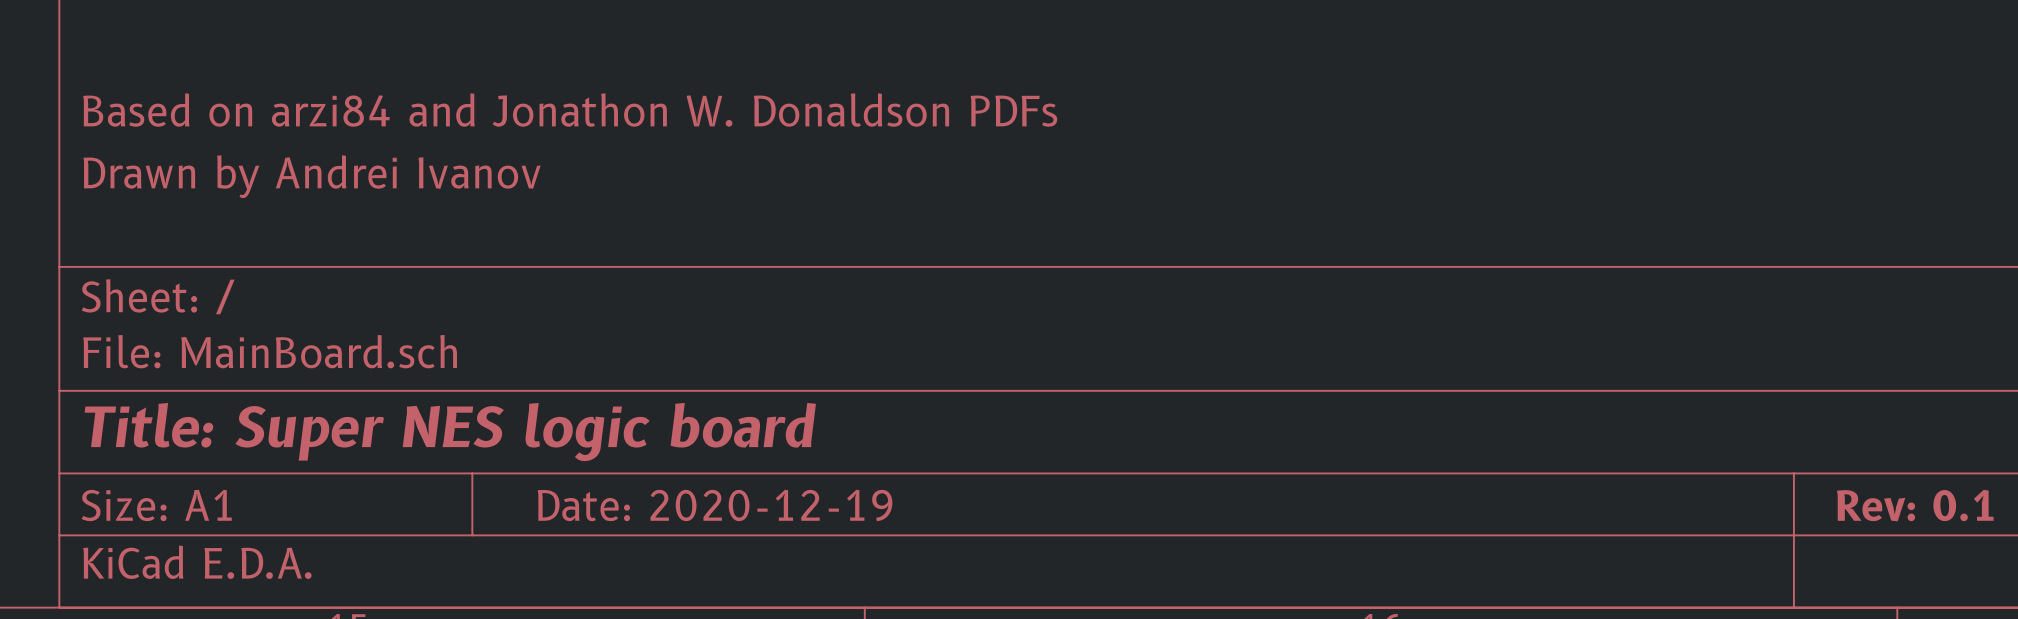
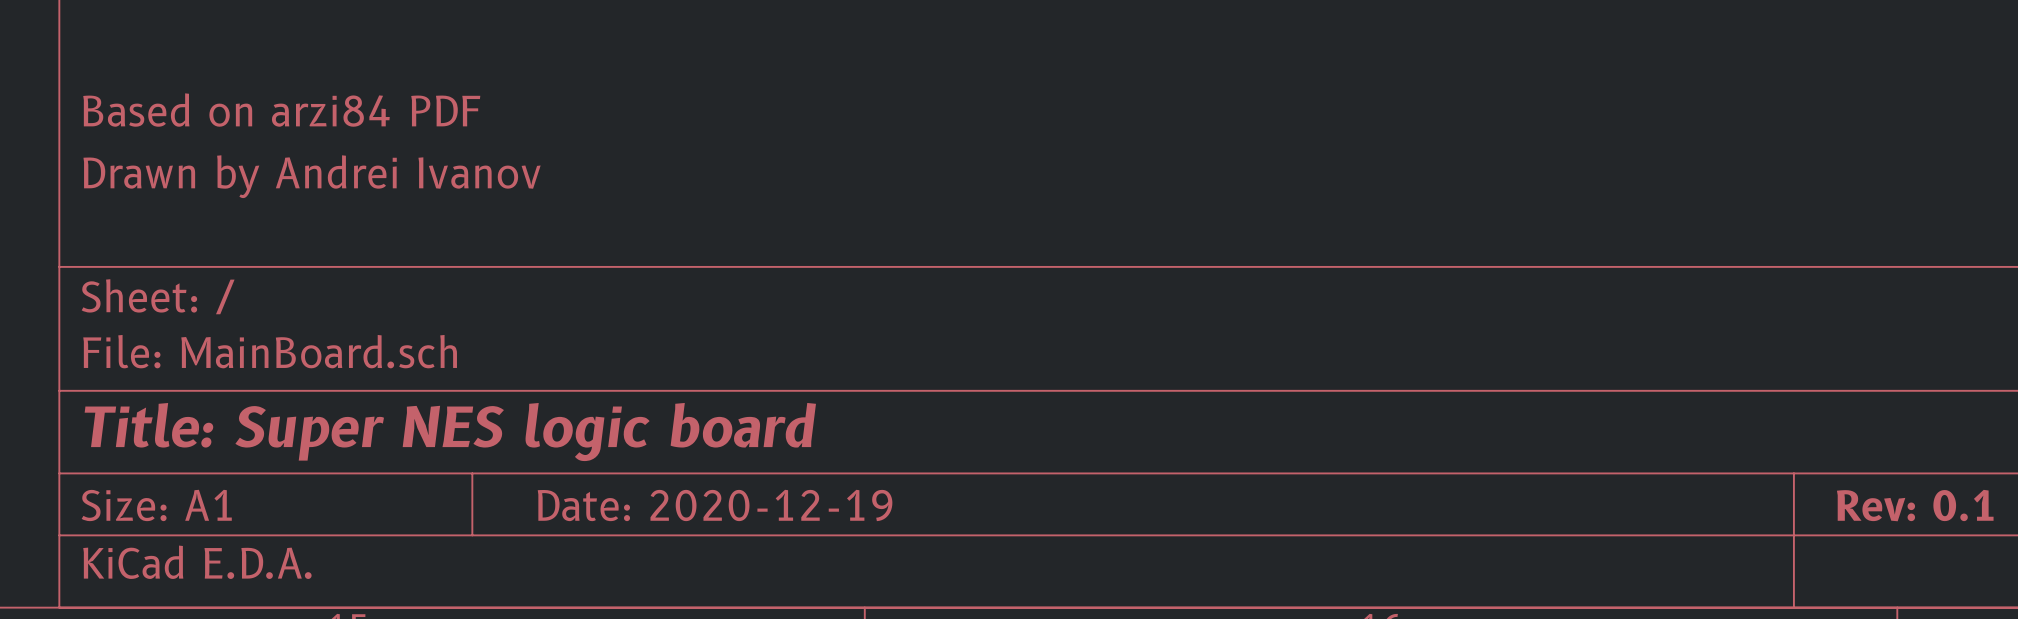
title block: Based on arzi84 and Jonathon W. Donaldson PDFs (570, 110) -> Based on arzi84 PDF (281, 110)

